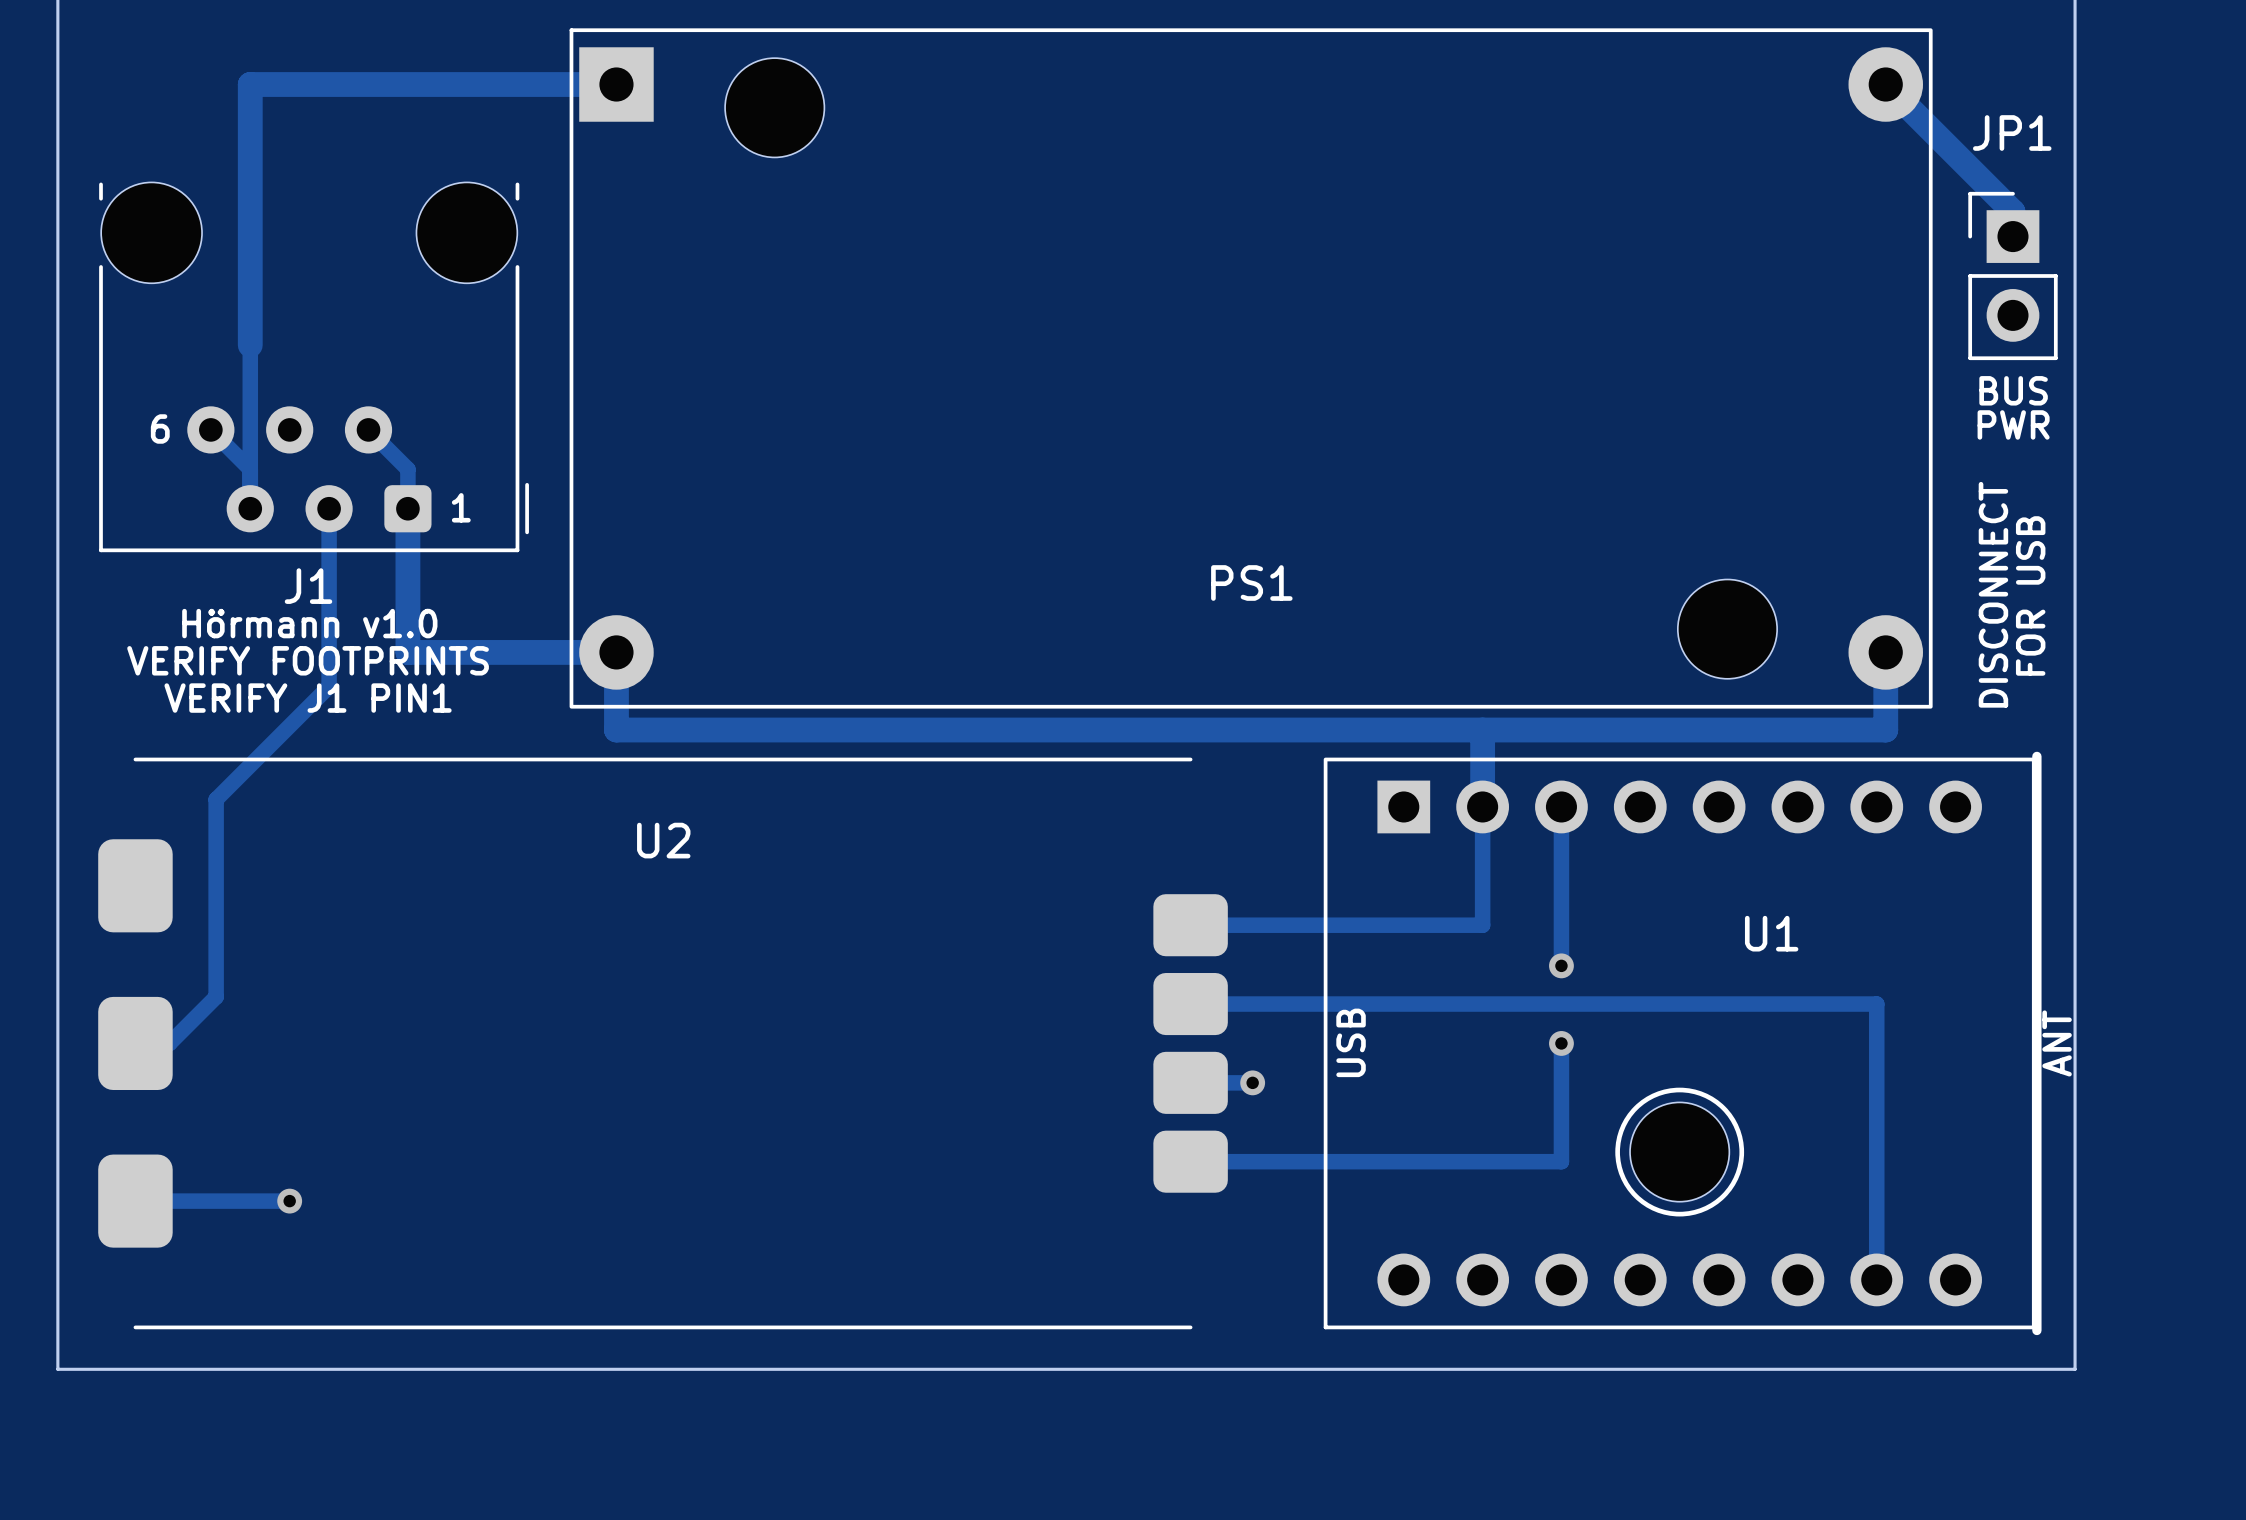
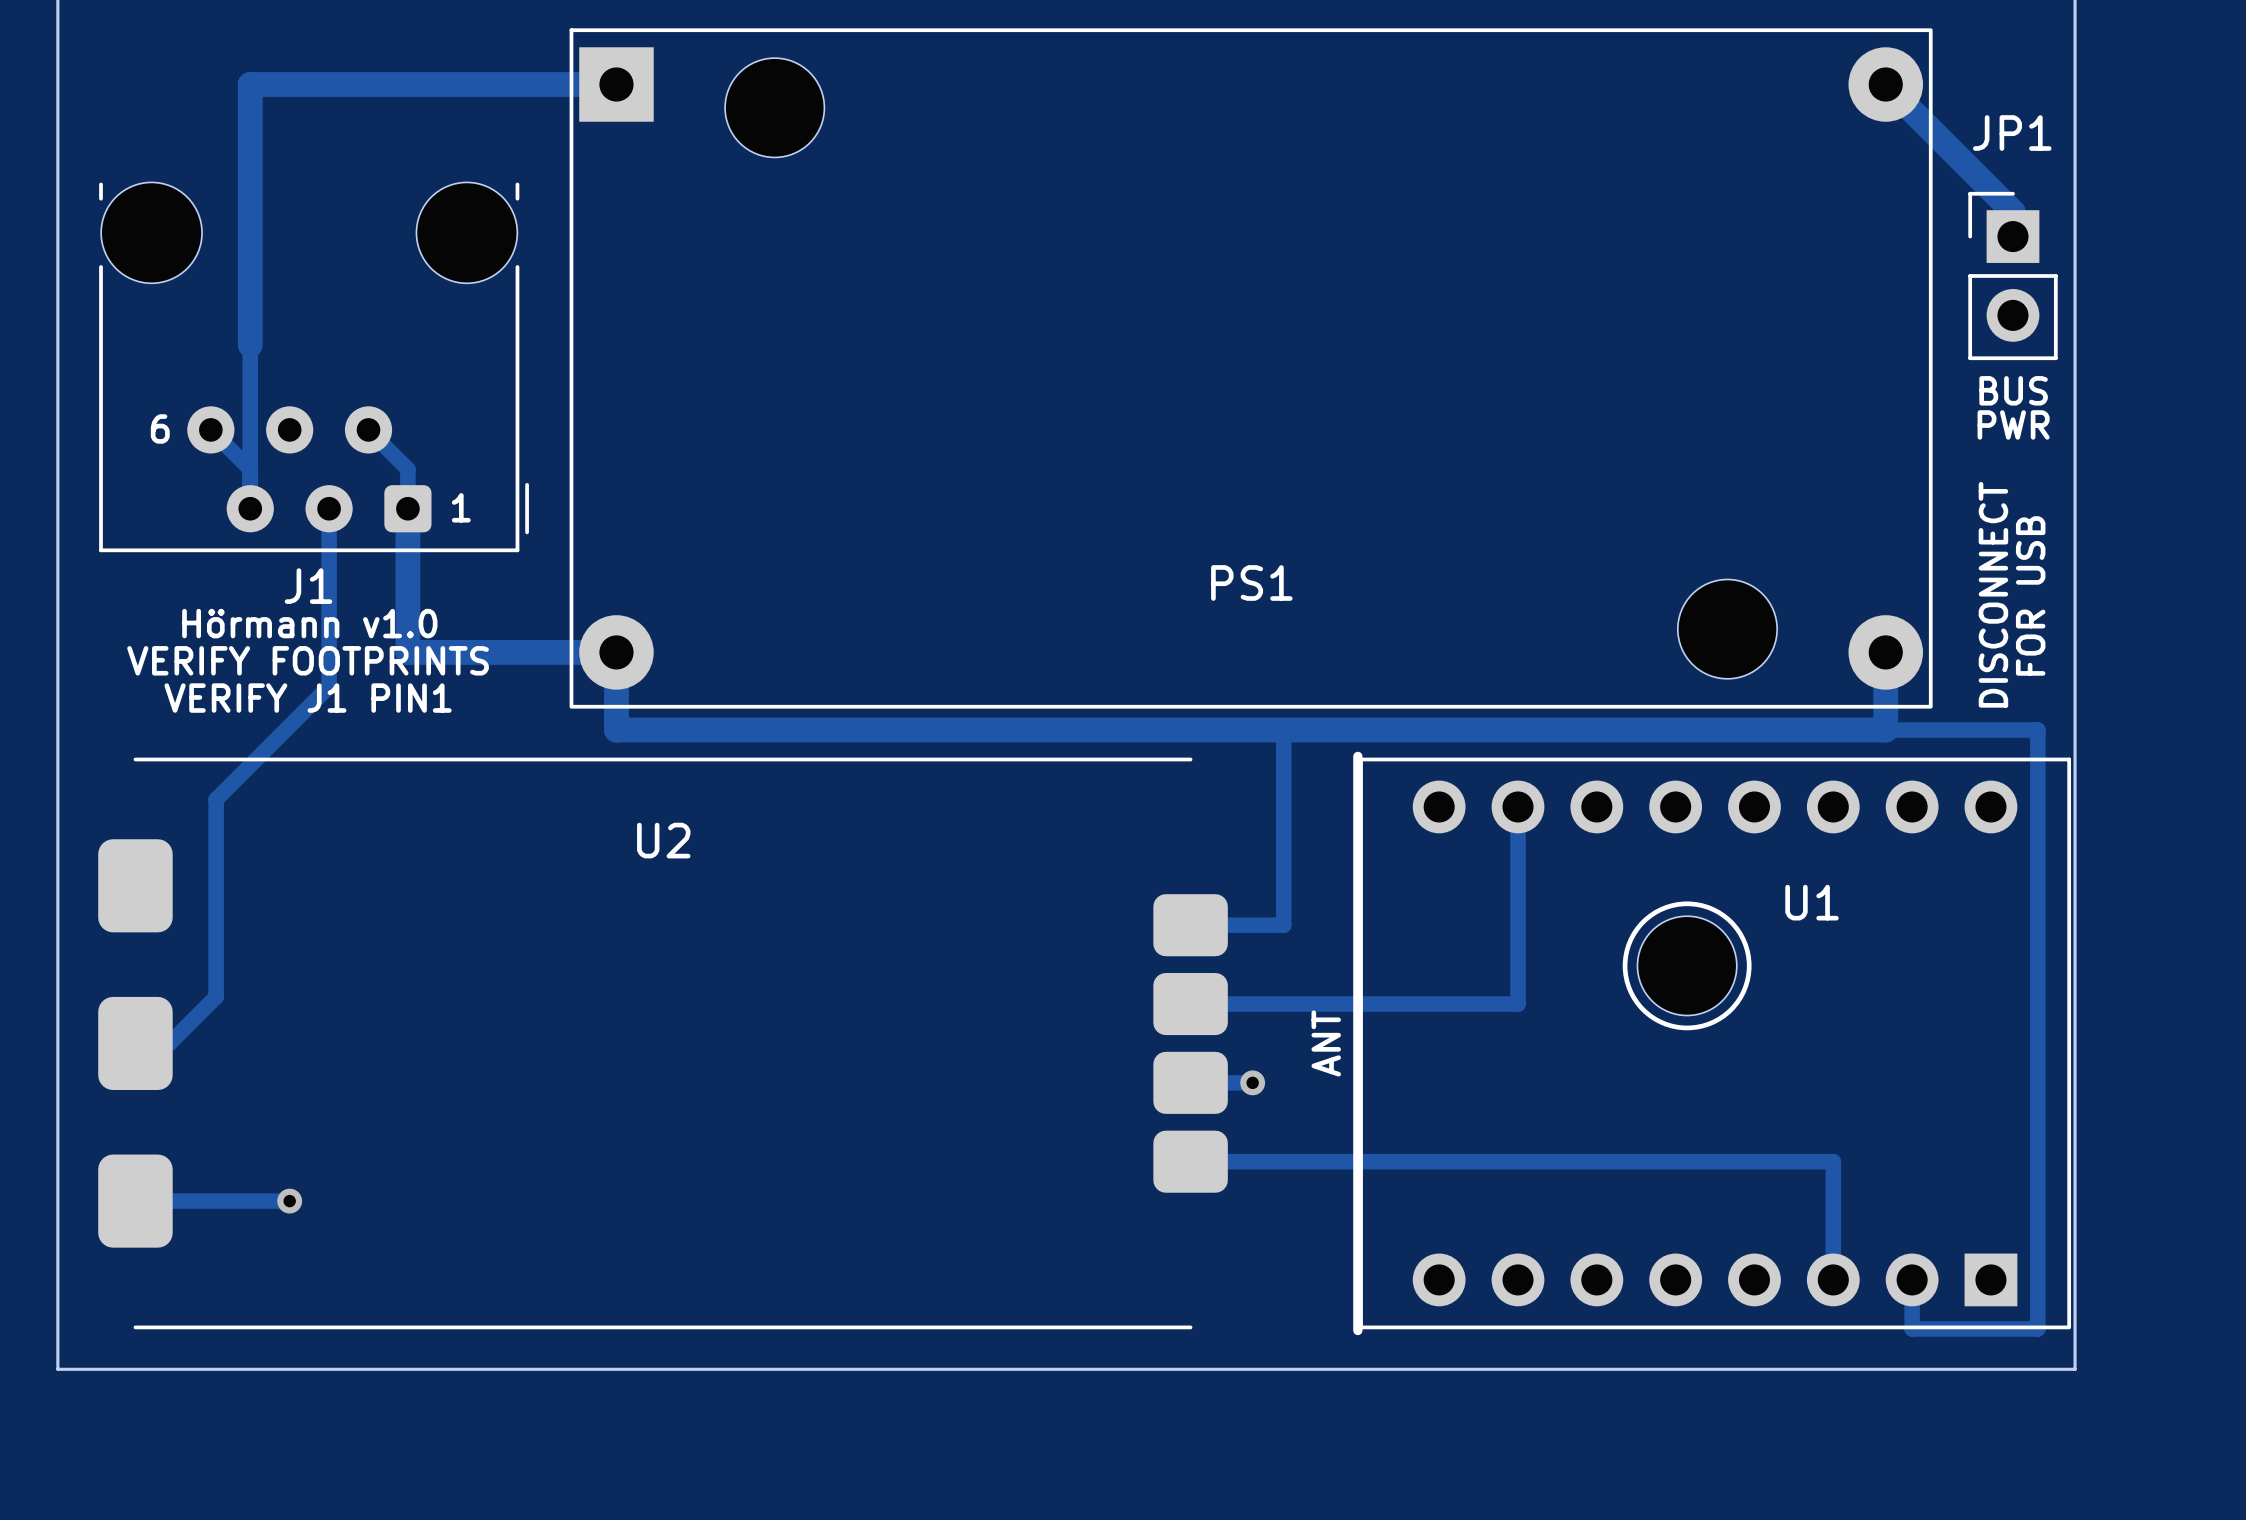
track: (1482, 730) (1482, 925) (1283, 925) -> (1283, 730) (1283, 925)
track: none -> (1885, 730) (2037, 730) (2037, 1328) (1912, 1328) (1912, 1279)
track: (1561, 806) (1561, 965) -> none
via: (1561, 965) -> none
track: (1518, 1004) (1876, 1004) (1876, 1279) -> (1518, 1004) (1518, 806)
text: USB (1351, 1042) -> none
track: (1561, 1043) (1561, 1161) -> (1833, 1279) (1833, 1161) (1561, 1161)
via: (1561, 1043) -> none
U1 rotation: 0° (1682, 1043) -> 180° (1712, 1043)
text position: ANT (2057, 1043) -> ANT (1326, 1043)
part position: (1679, 1152) -> (1687, 965)

